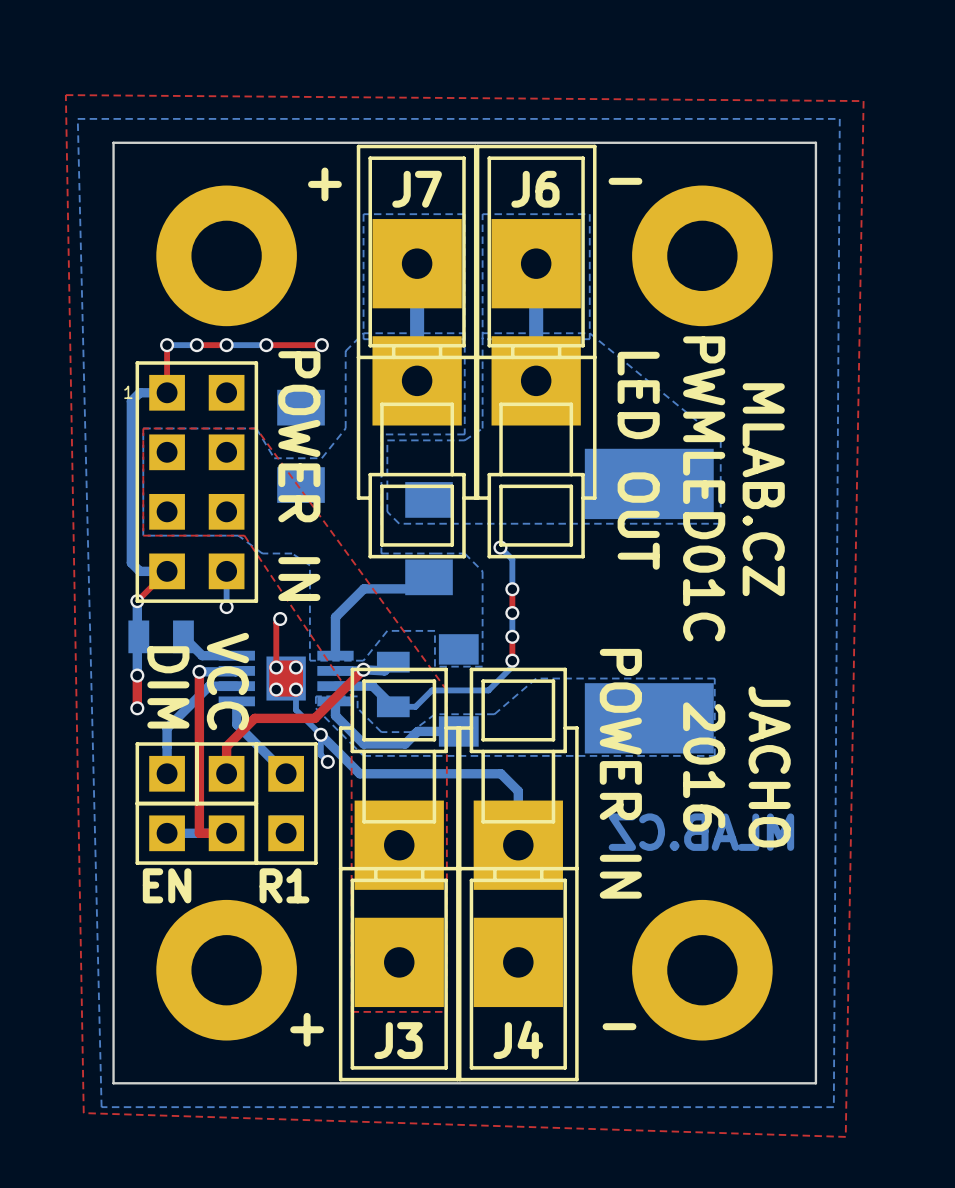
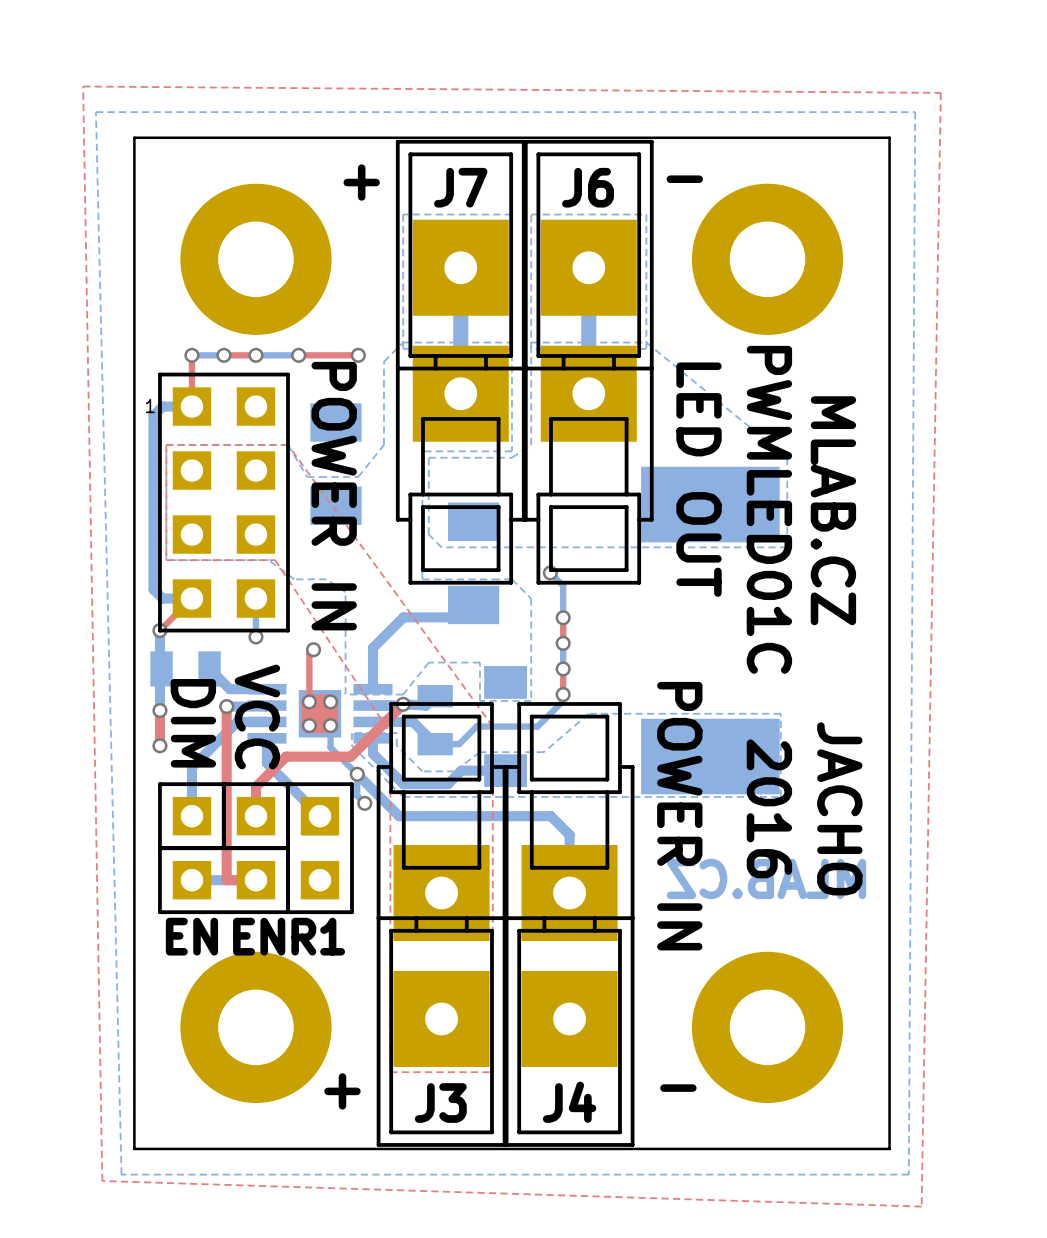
text: none -> EN (259, 936)

